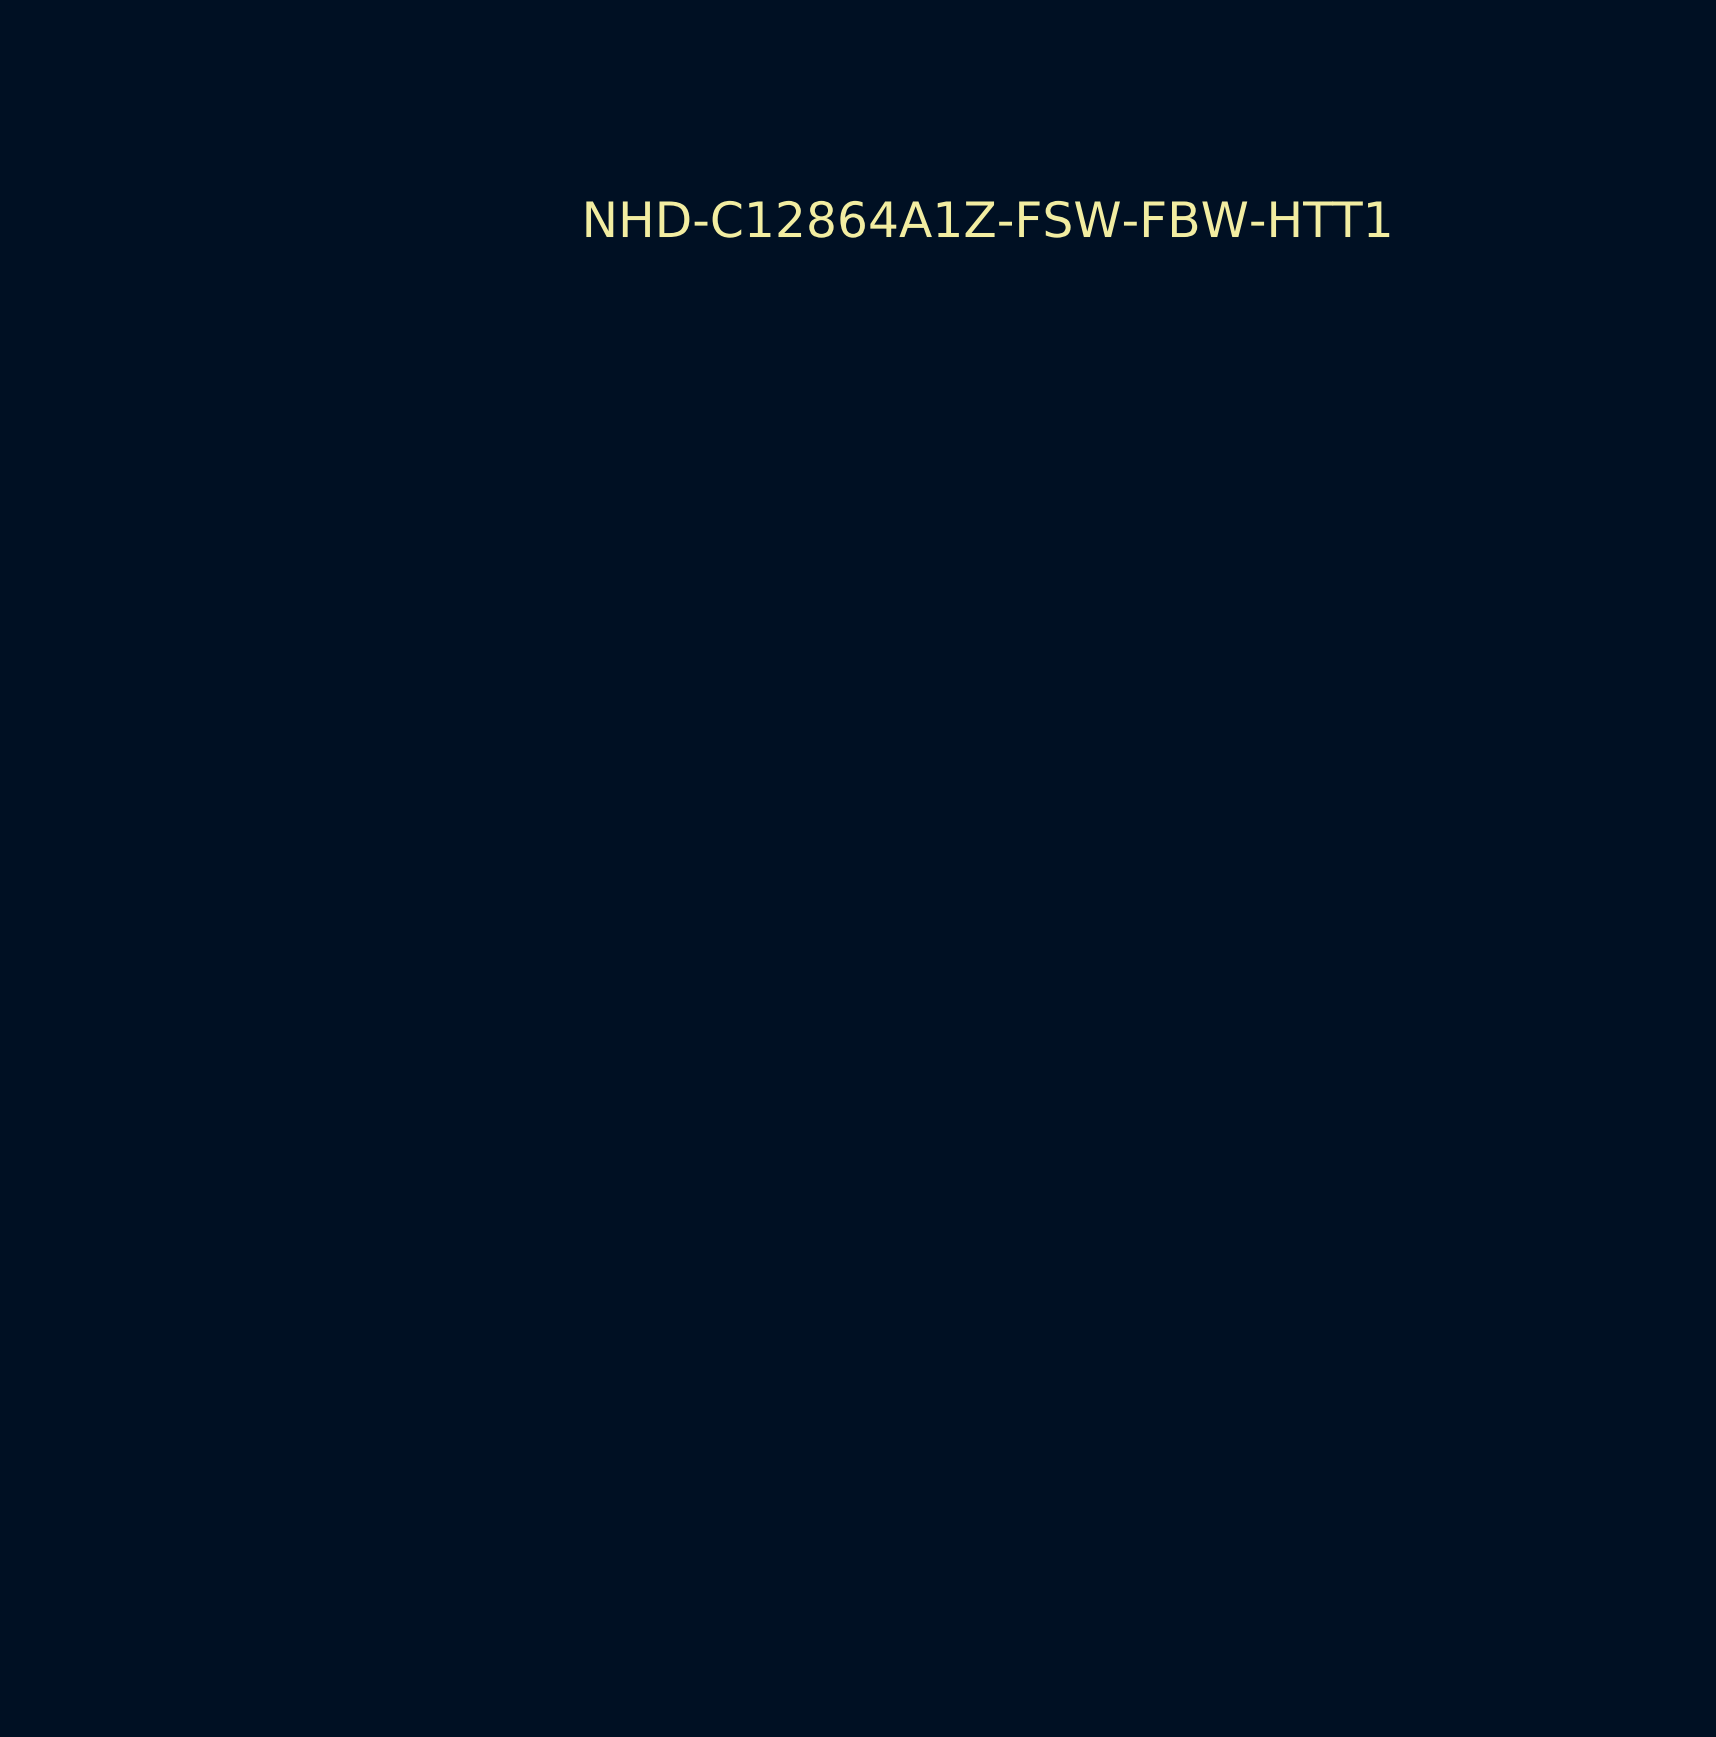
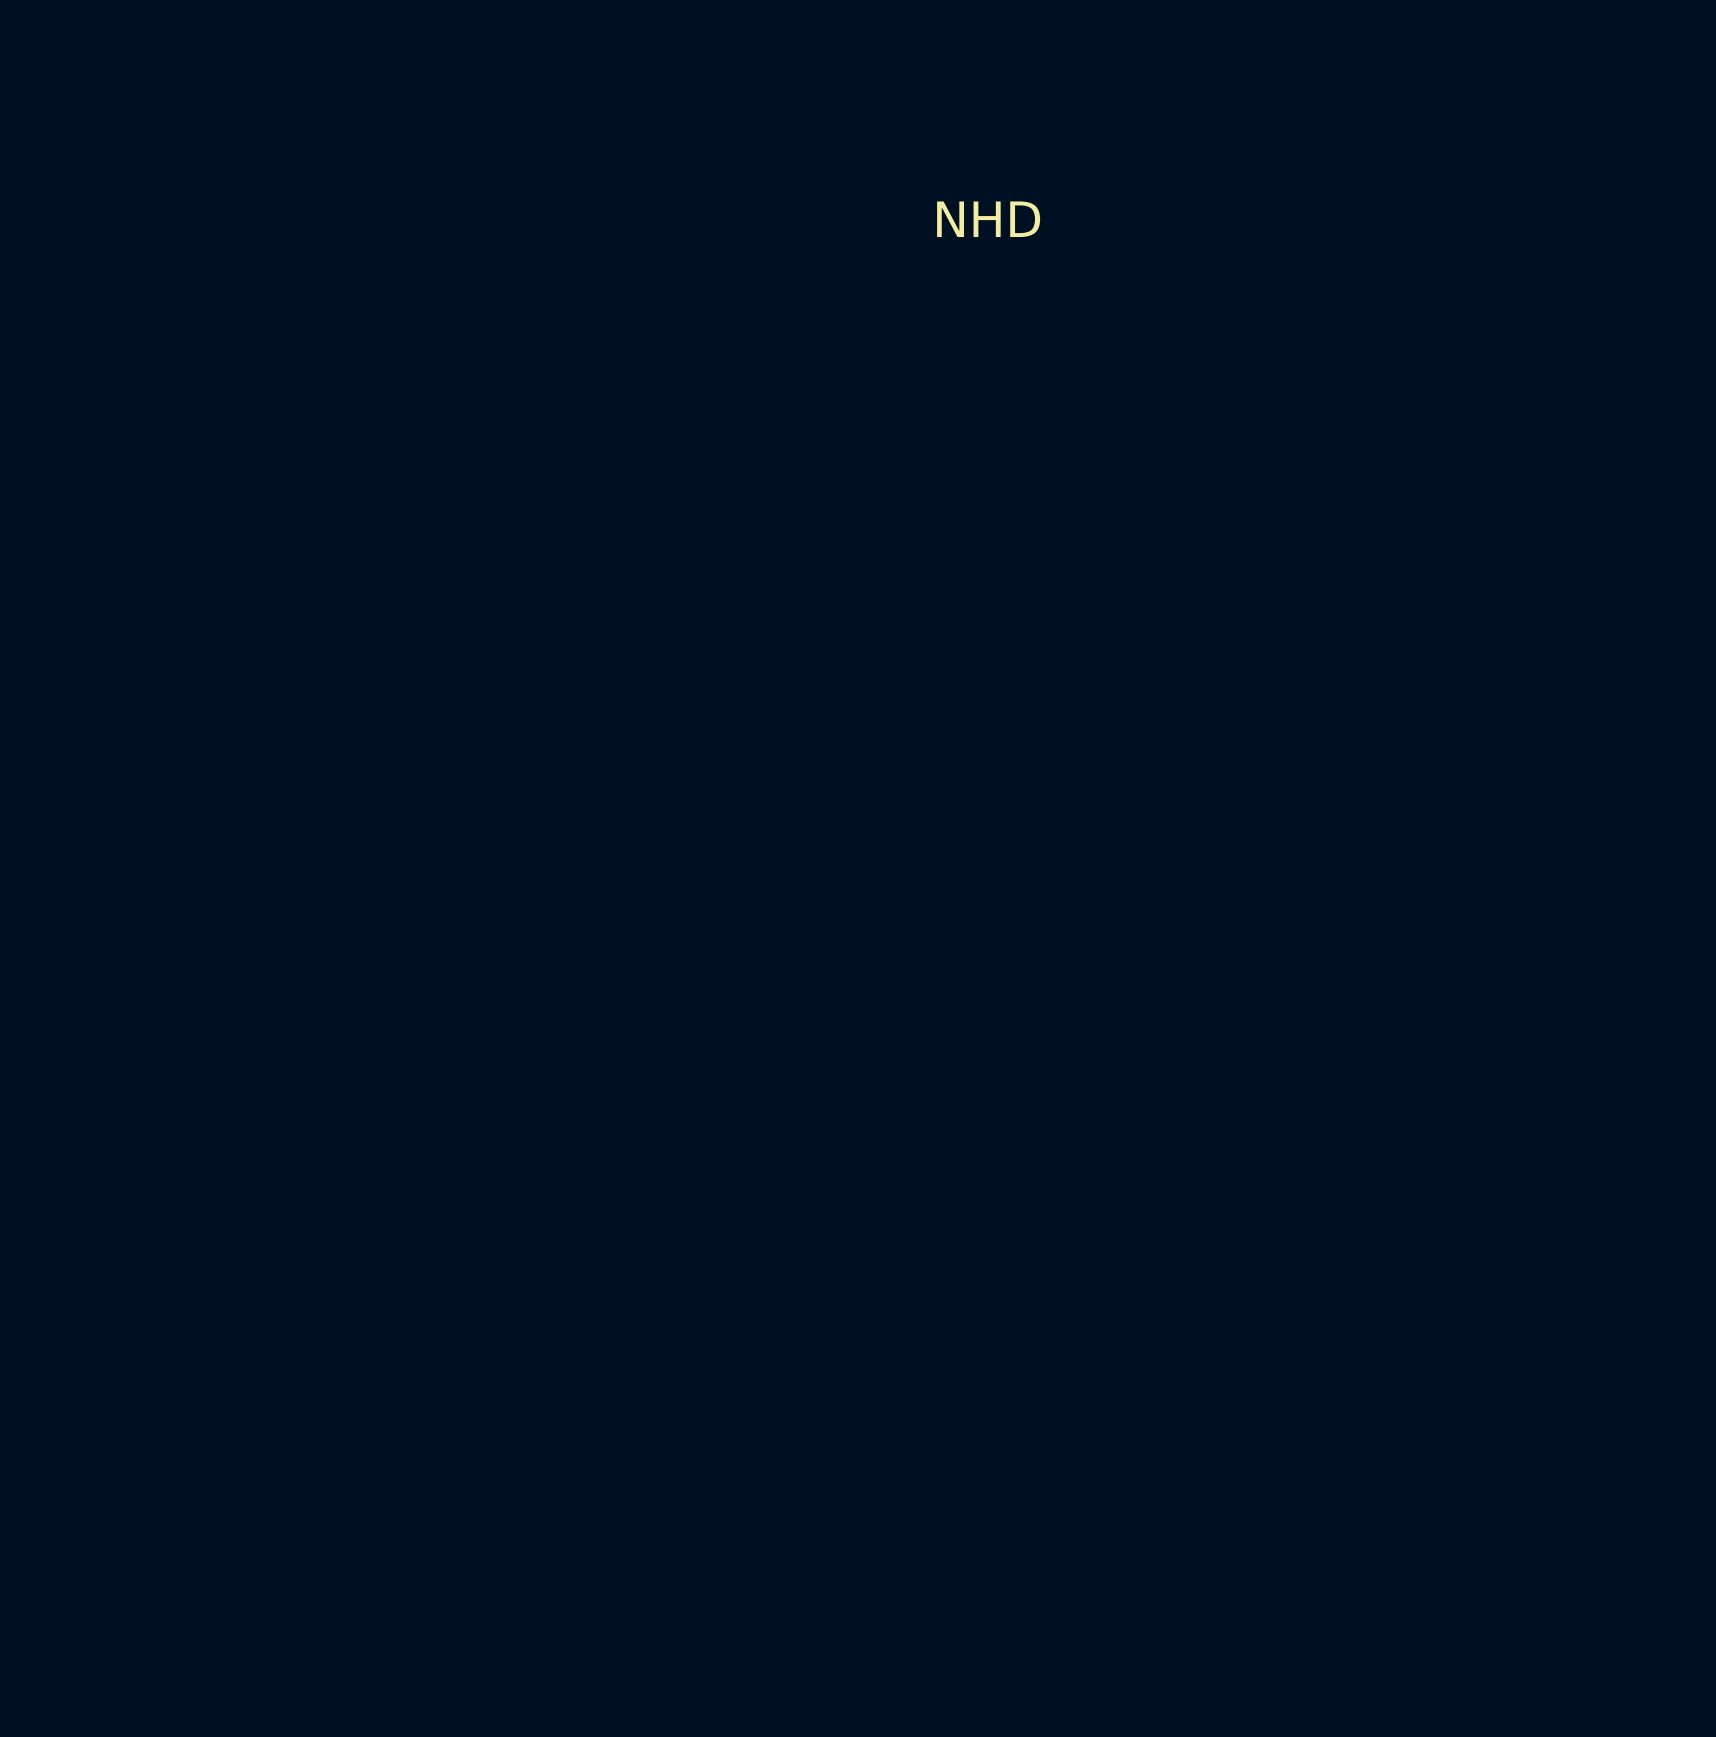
NHD-C12864A1Z-FSW-FBW-HTT1 name: NHD-C12864A1Z-FSW-FBW-HTT1 (987, 219) -> NHD (988, 219)

